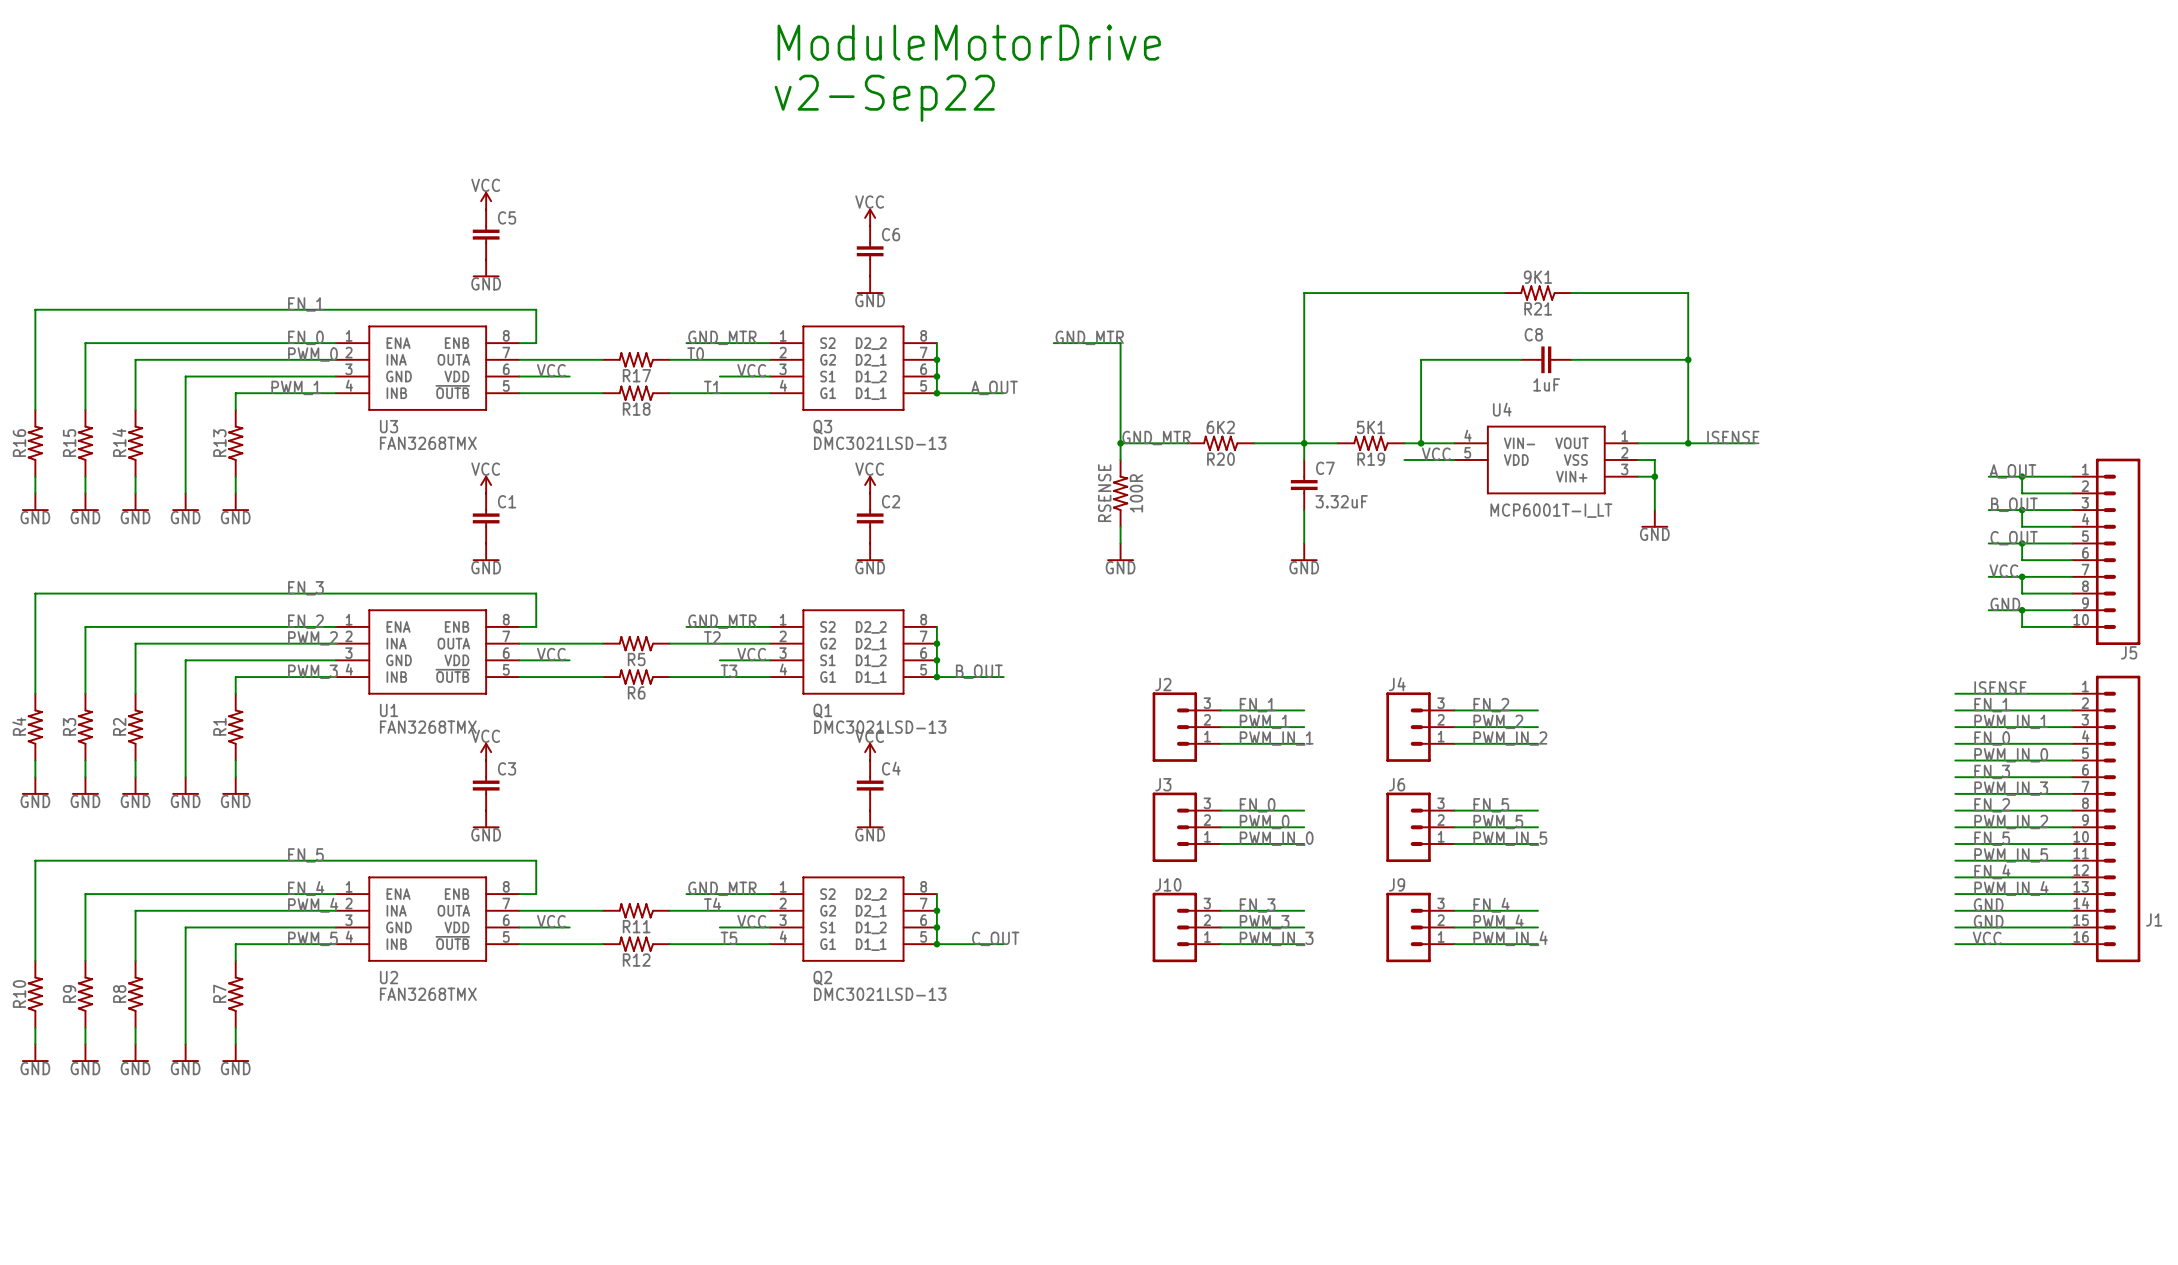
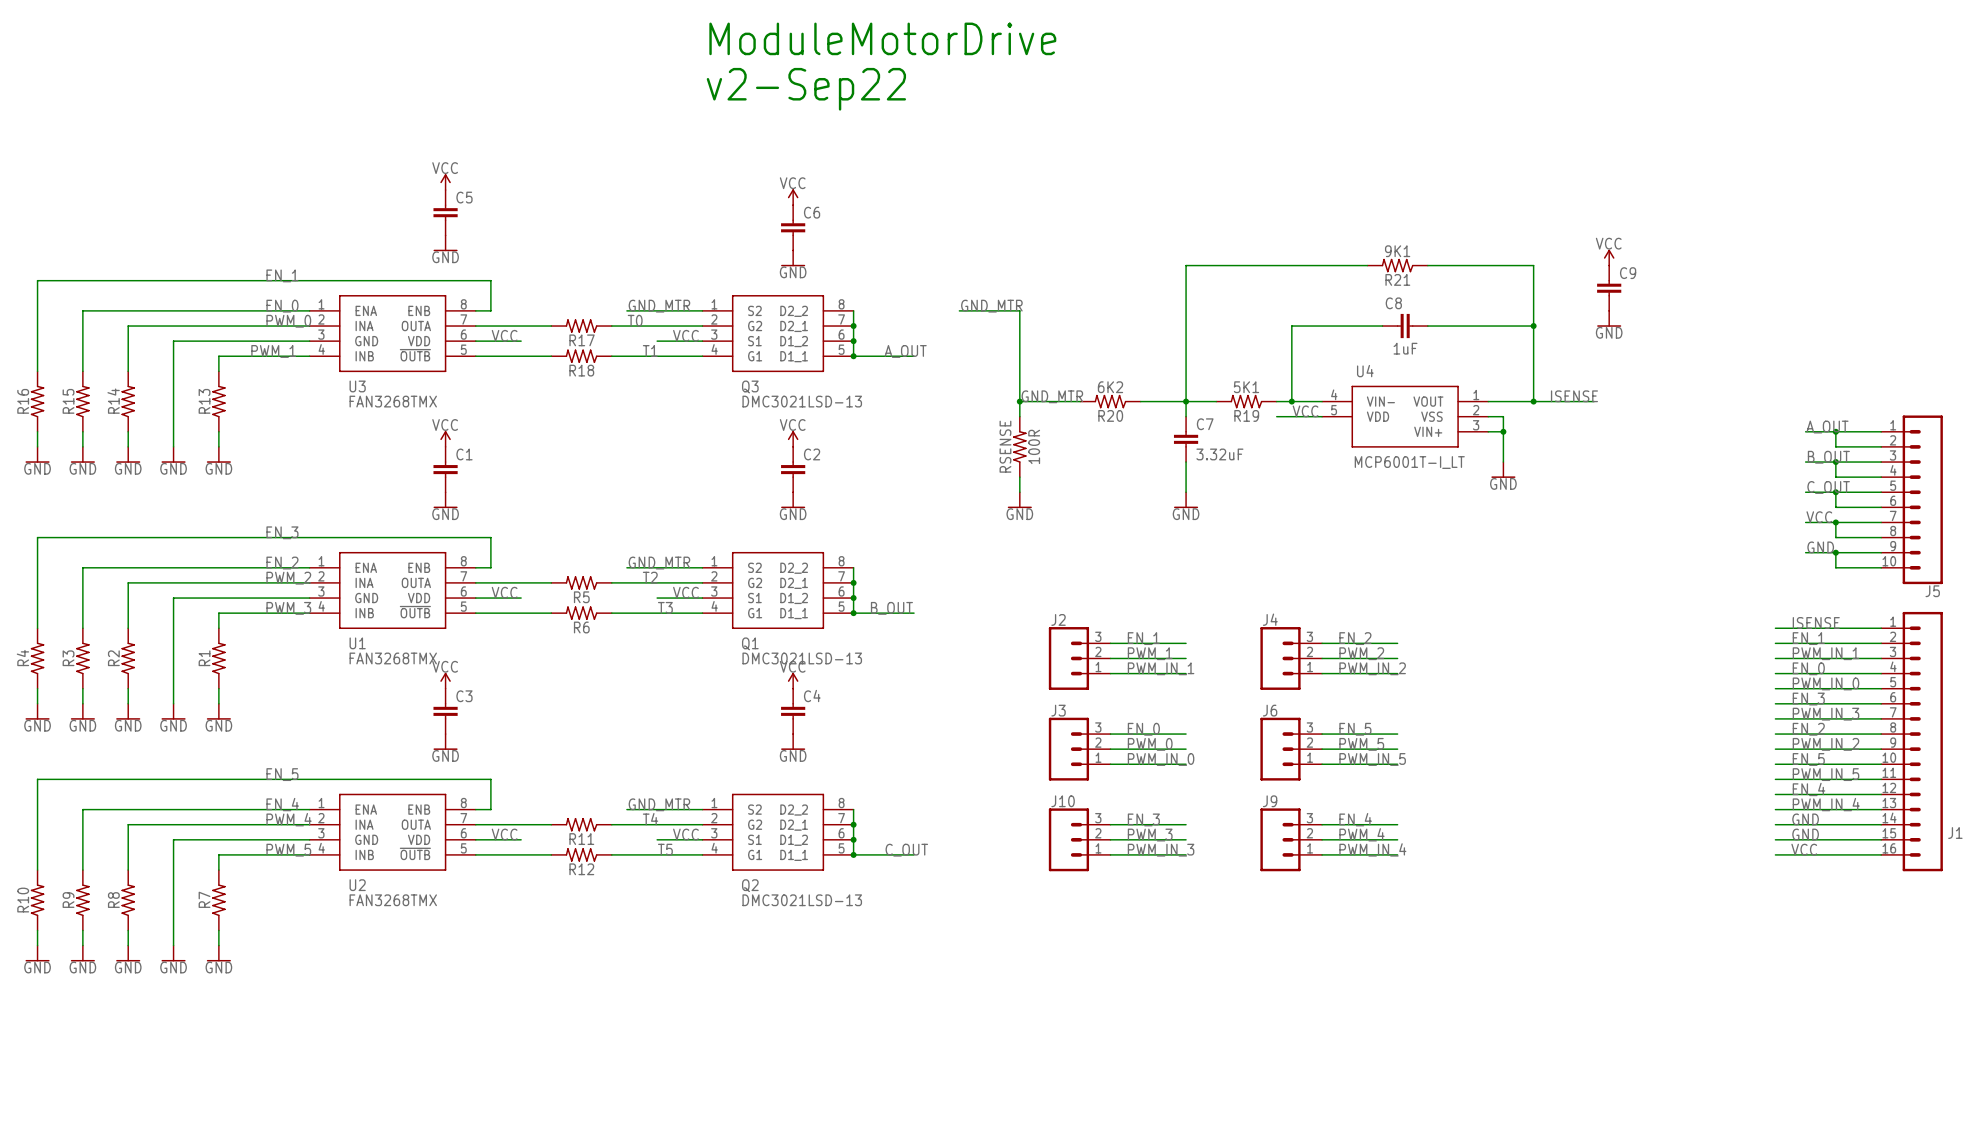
power symbol: none -> VCC (1609, 257)
C9: none -> (1609, 288)
power symbol: none -> GND (1609, 318)

